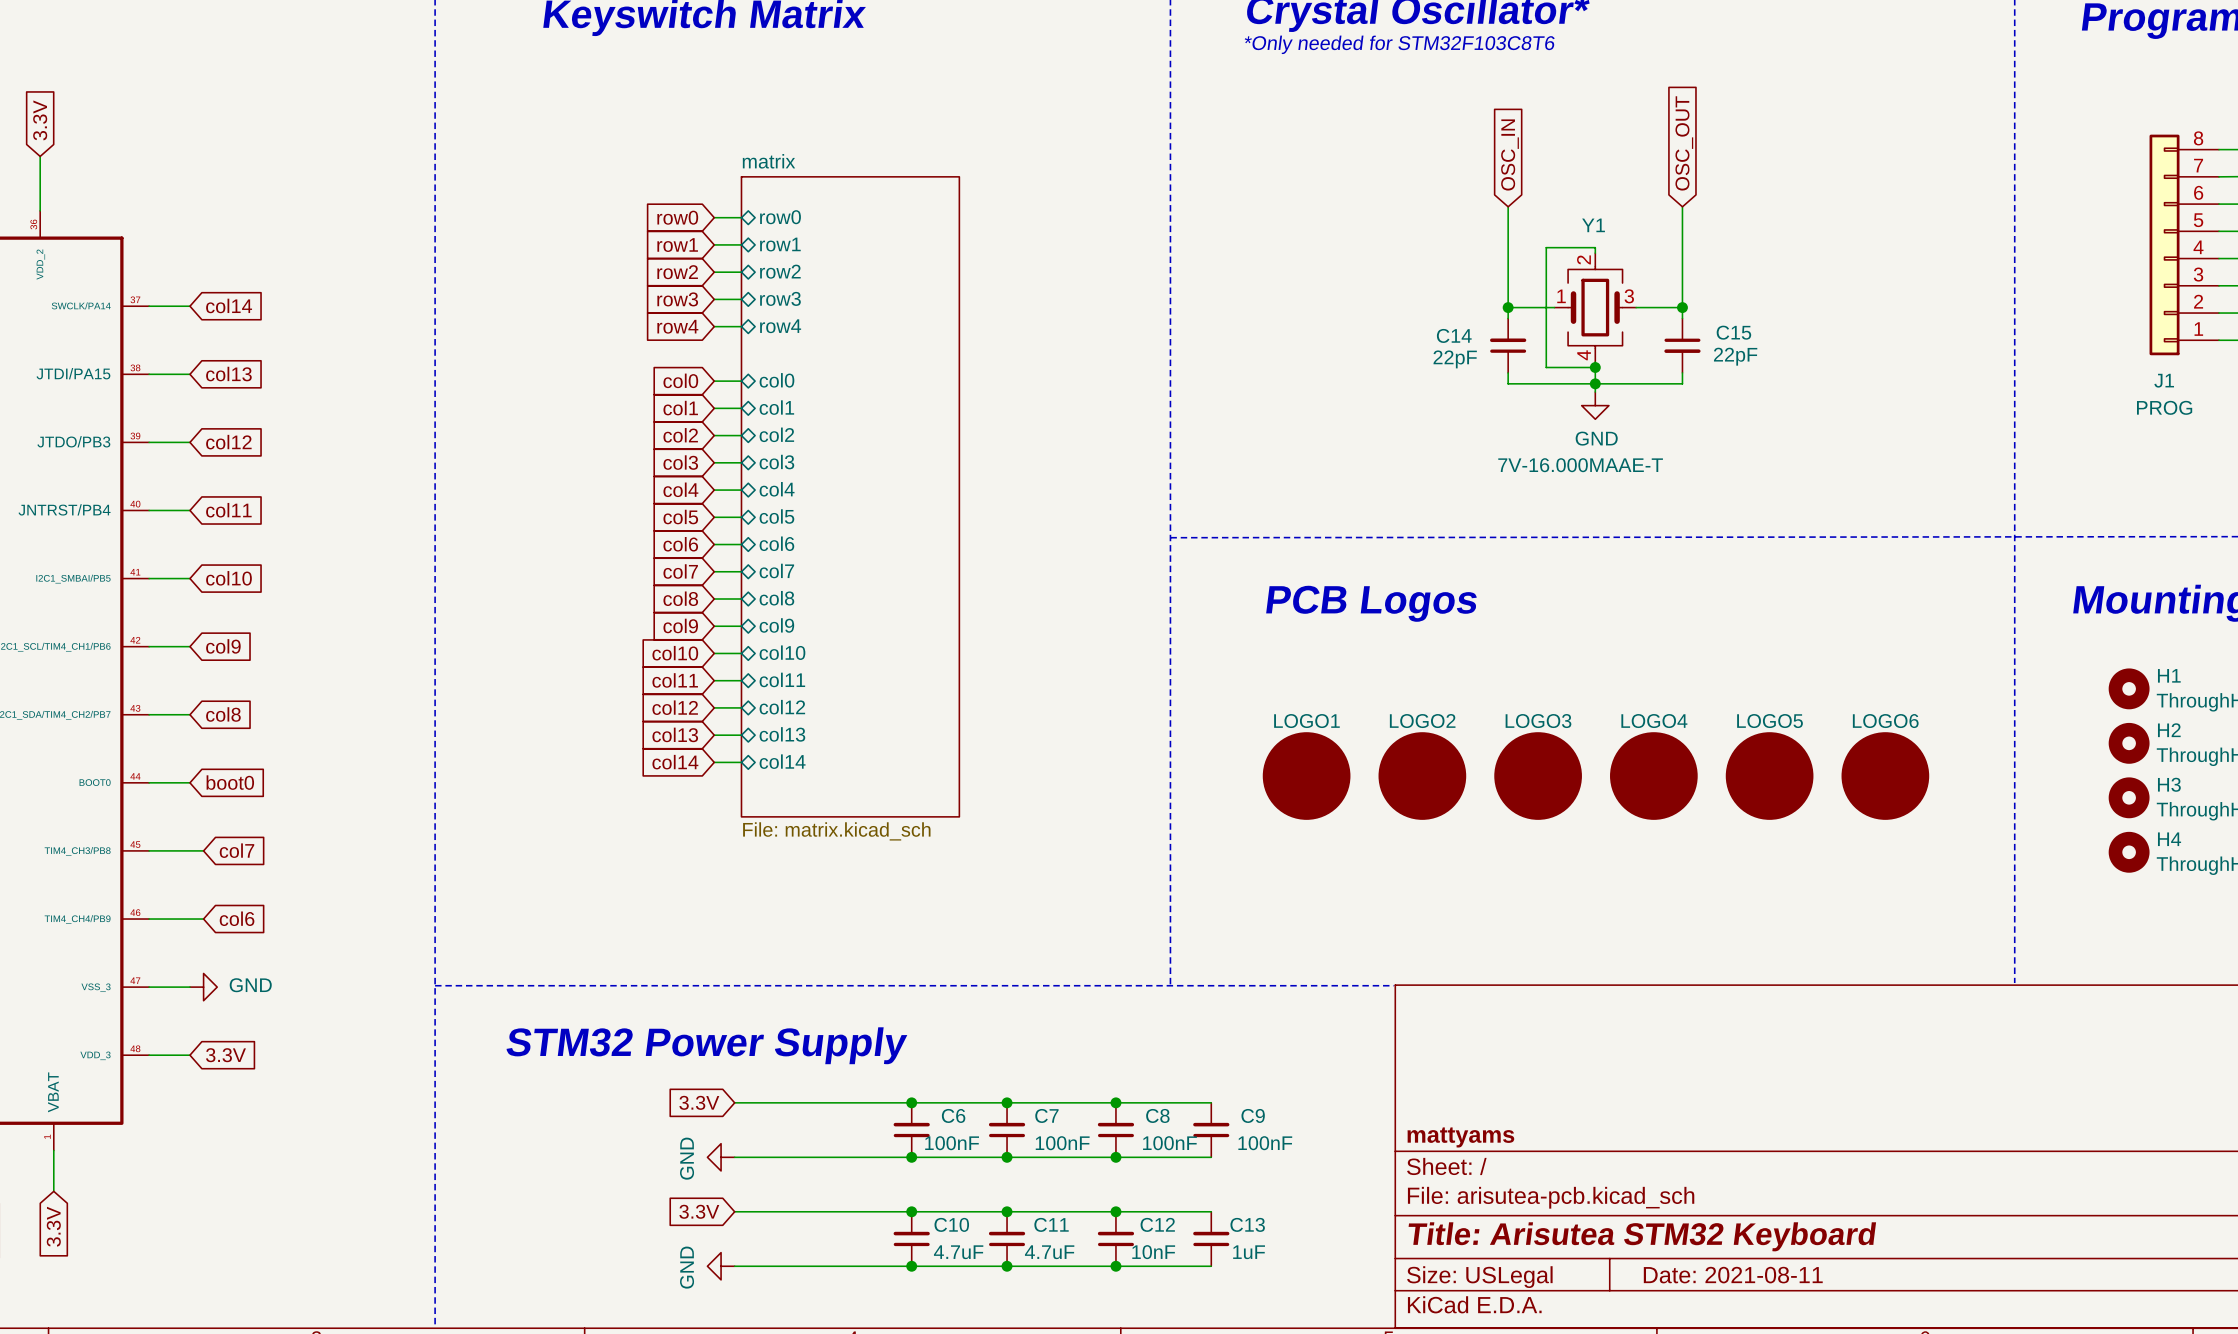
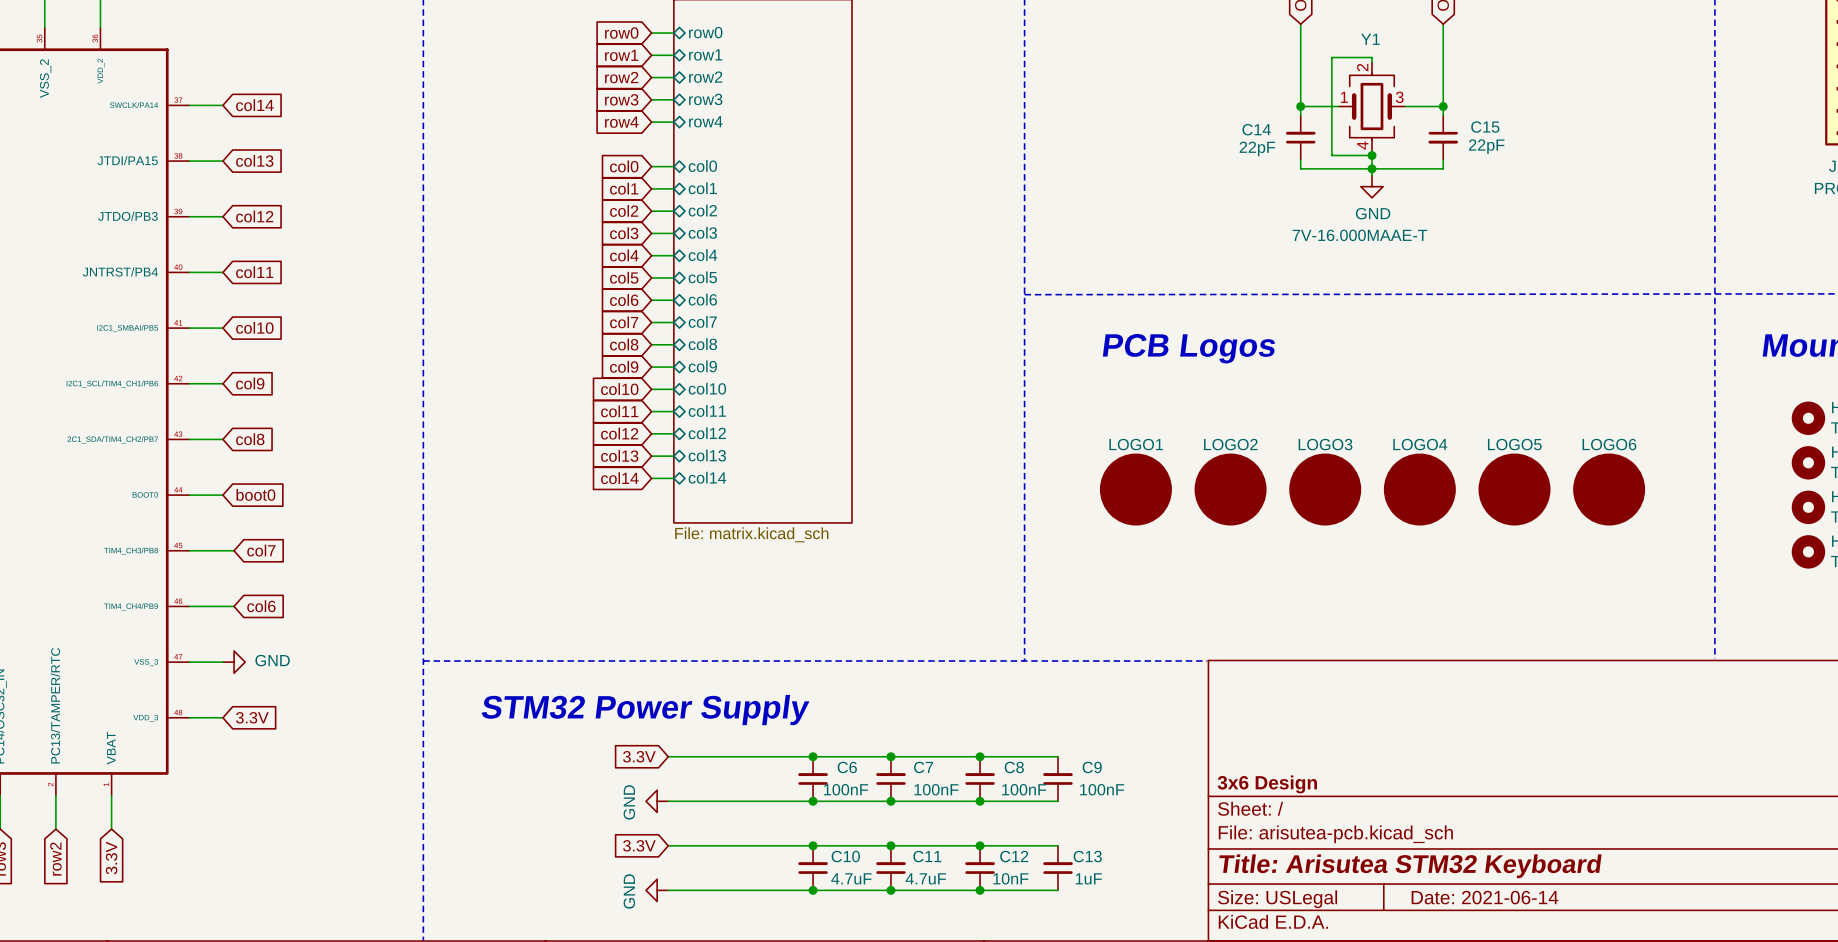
title block: mattyams (1460, 1137) -> 3x6 Design (1267, 784)
title block: Date: 2021-08-11 (1733, 1275) -> Date: 2021-06-14 (1484, 897)

